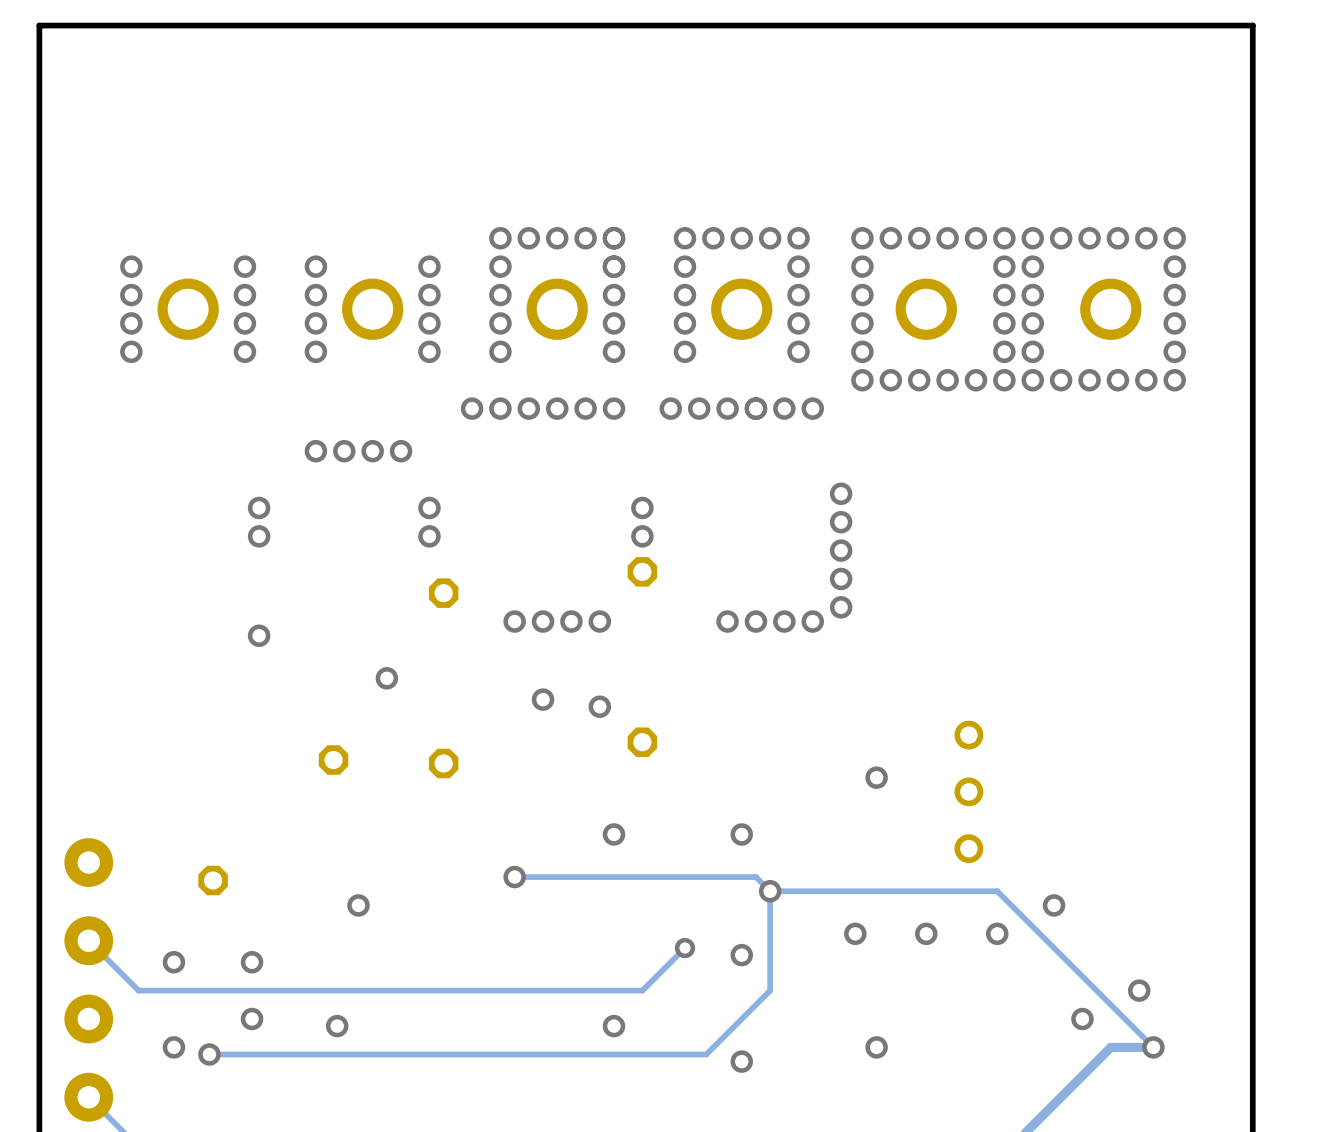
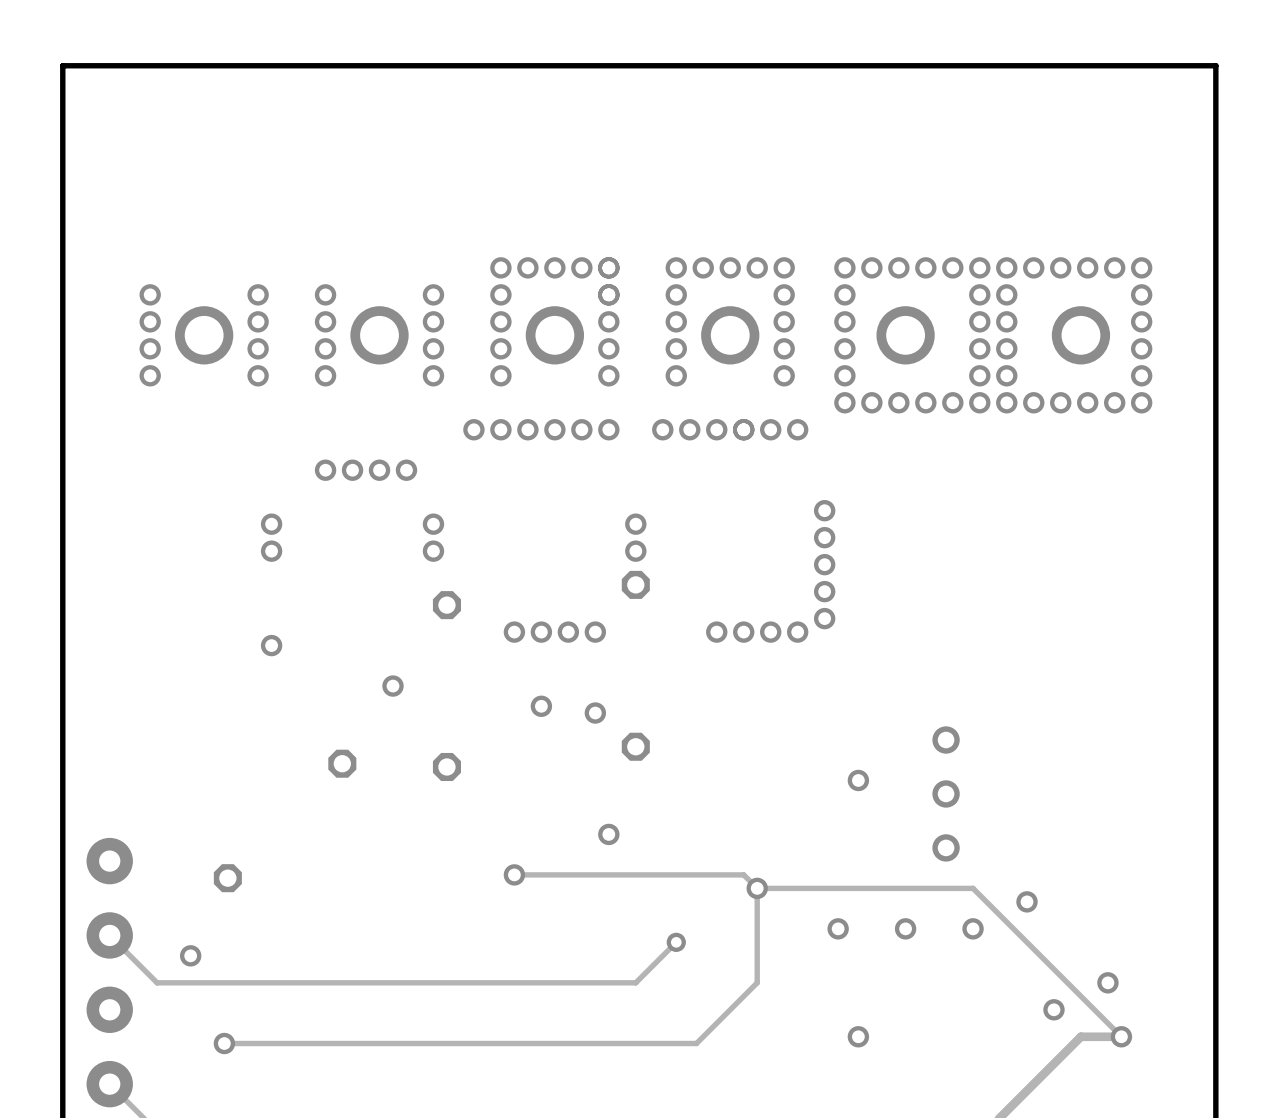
via: (741, 834) -> none
via: (358, 905) -> none
via: (741, 955) -> none
via: (252, 962) -> none
via: (252, 1019) -> none
via: (337, 1026) -> none
via: (614, 1026) -> none
via: (173, 1047) -> none
via: (741, 1061) -> none

